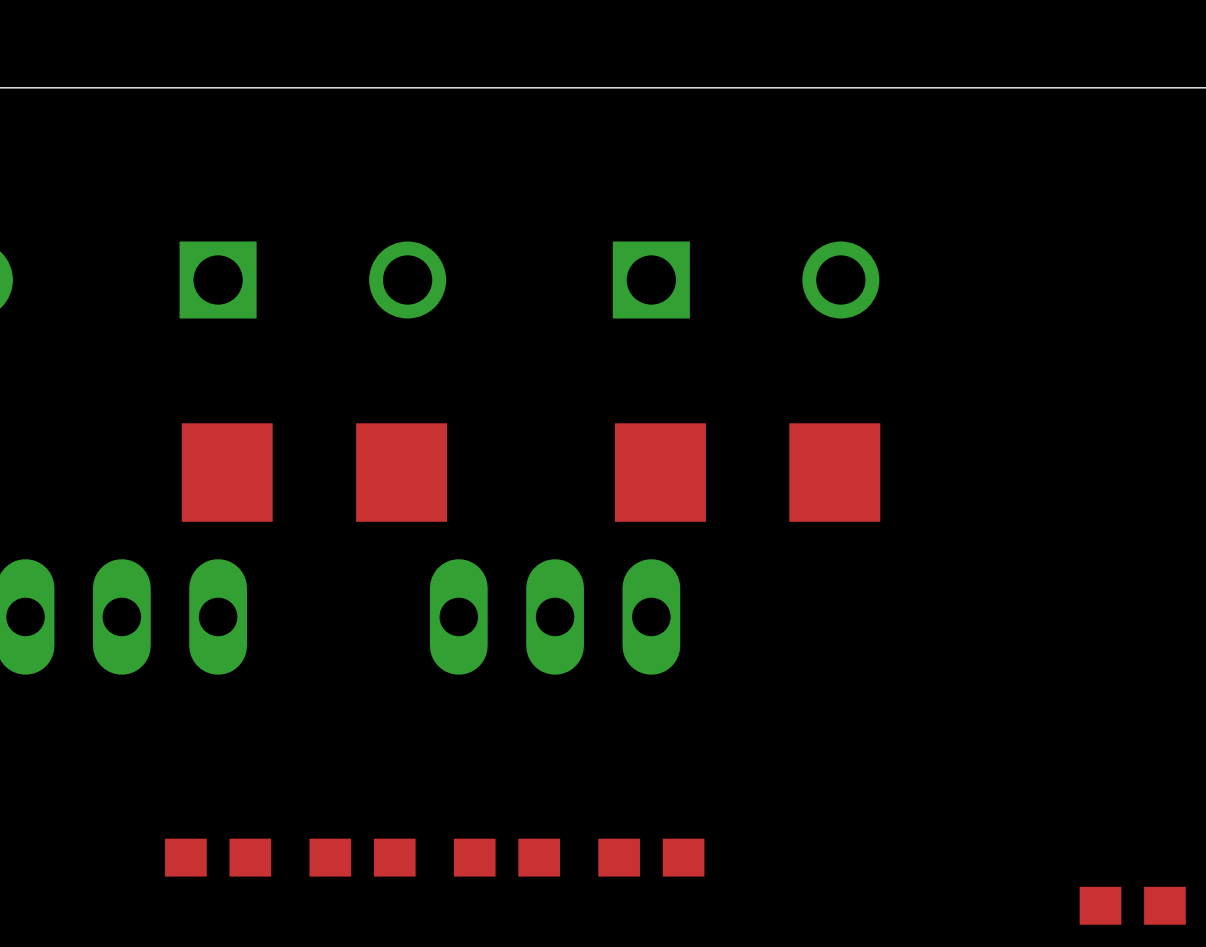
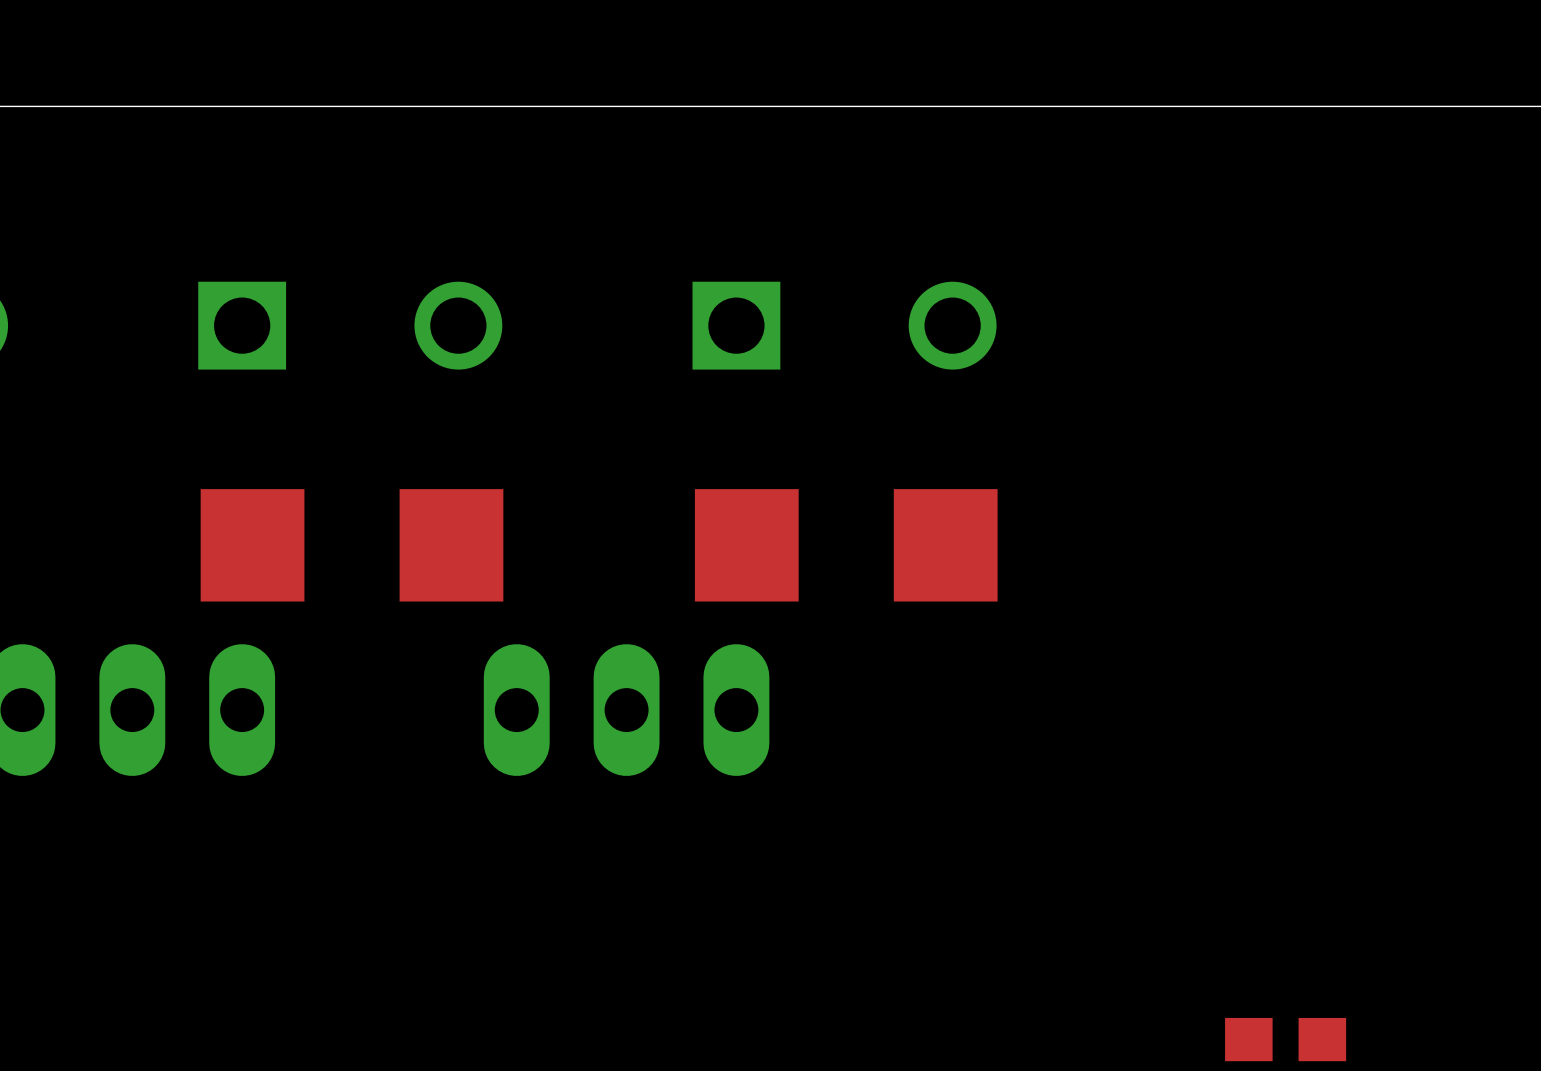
part: (218, 857) -> none
part: (362, 857) -> none
part: (506, 857) -> none
part: (651, 857) -> none

